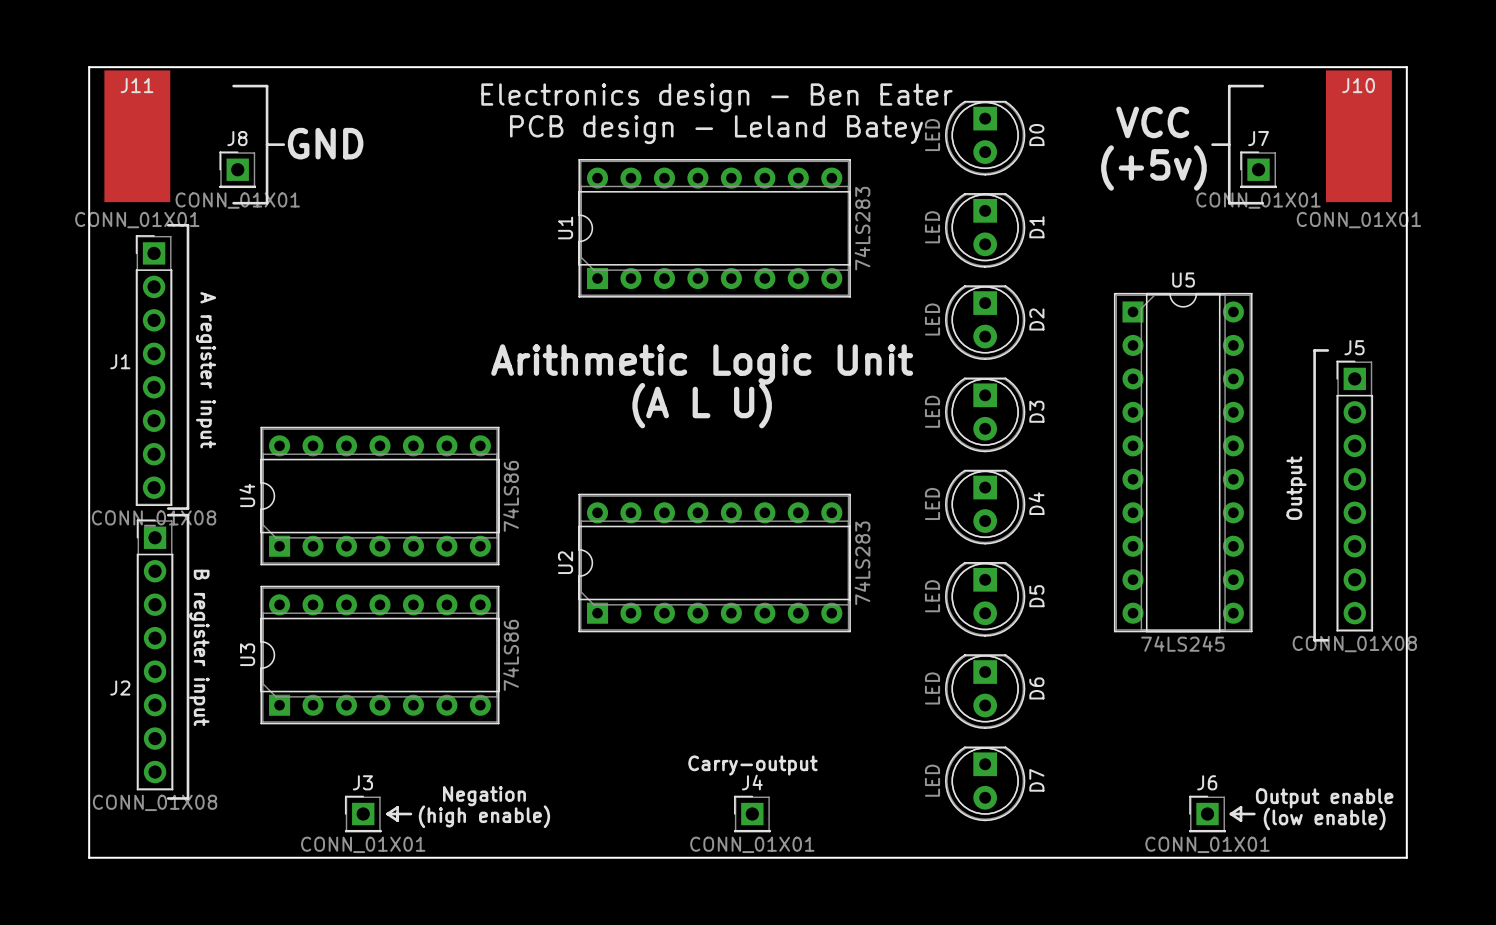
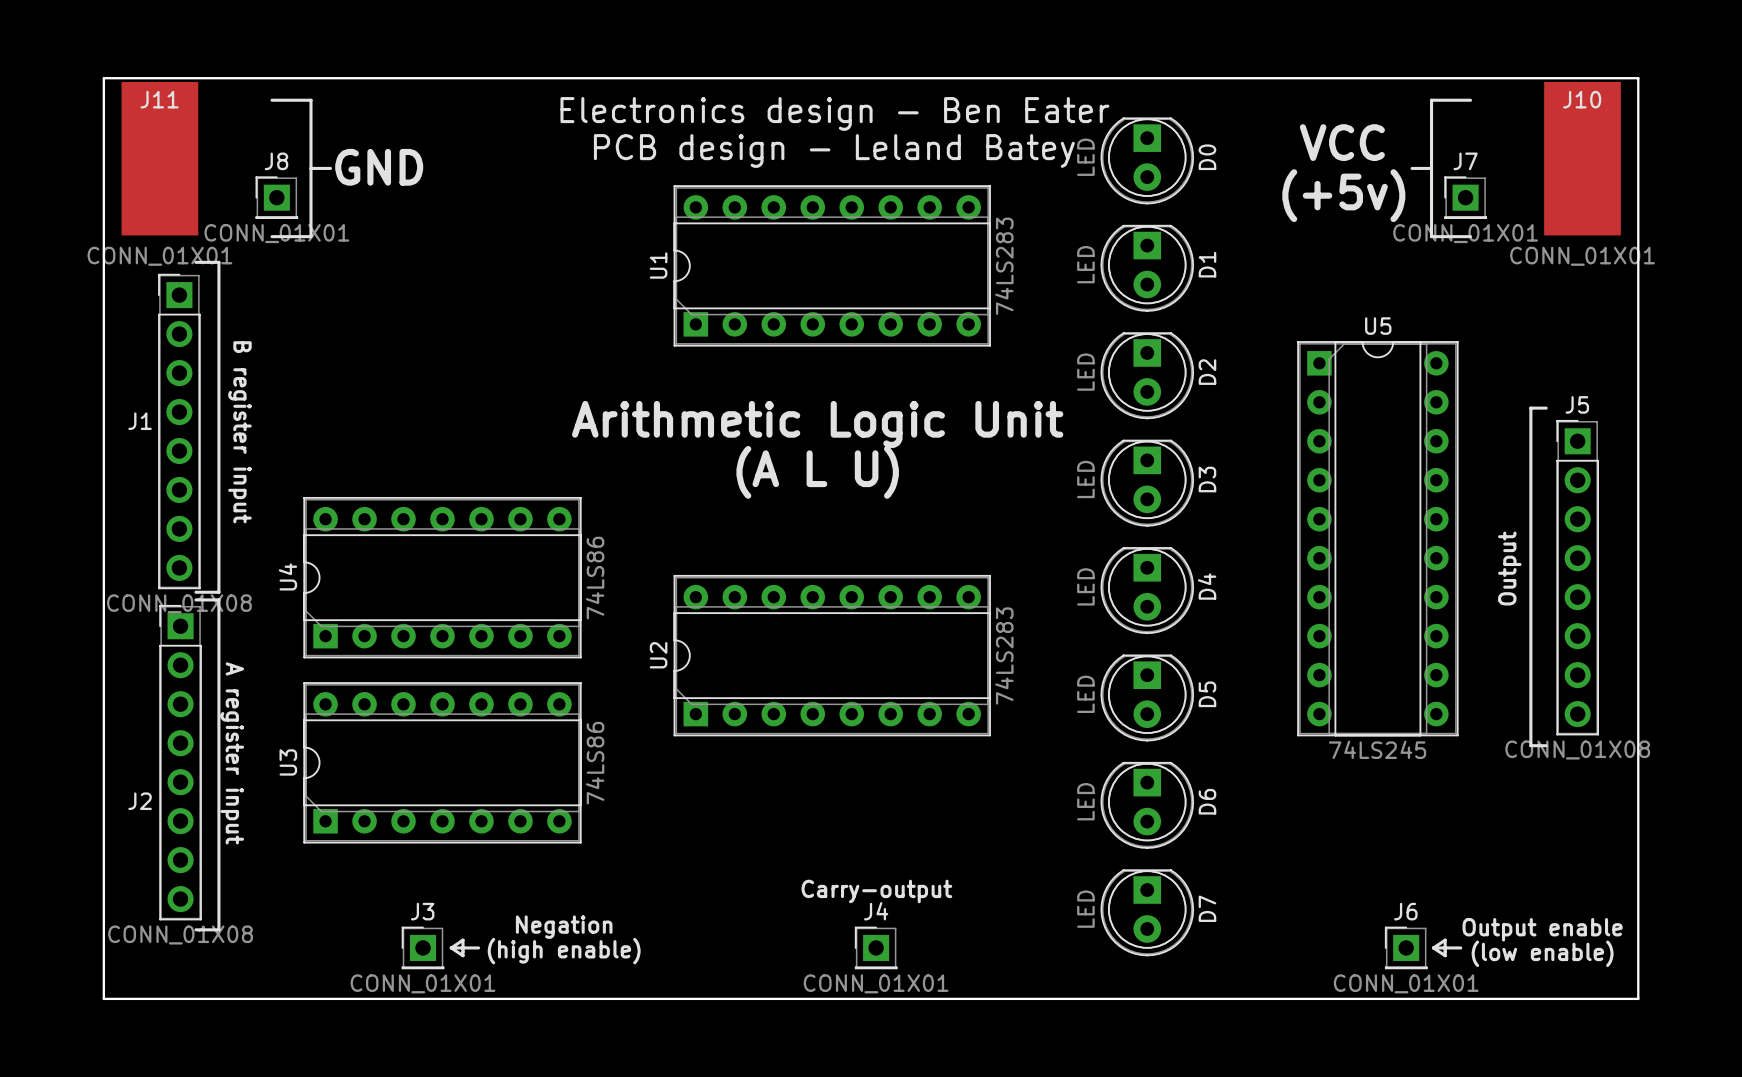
text: A register input (206, 370) -> B register input (239, 432)
text: B register input (199, 647) -> A register input (232, 753)

